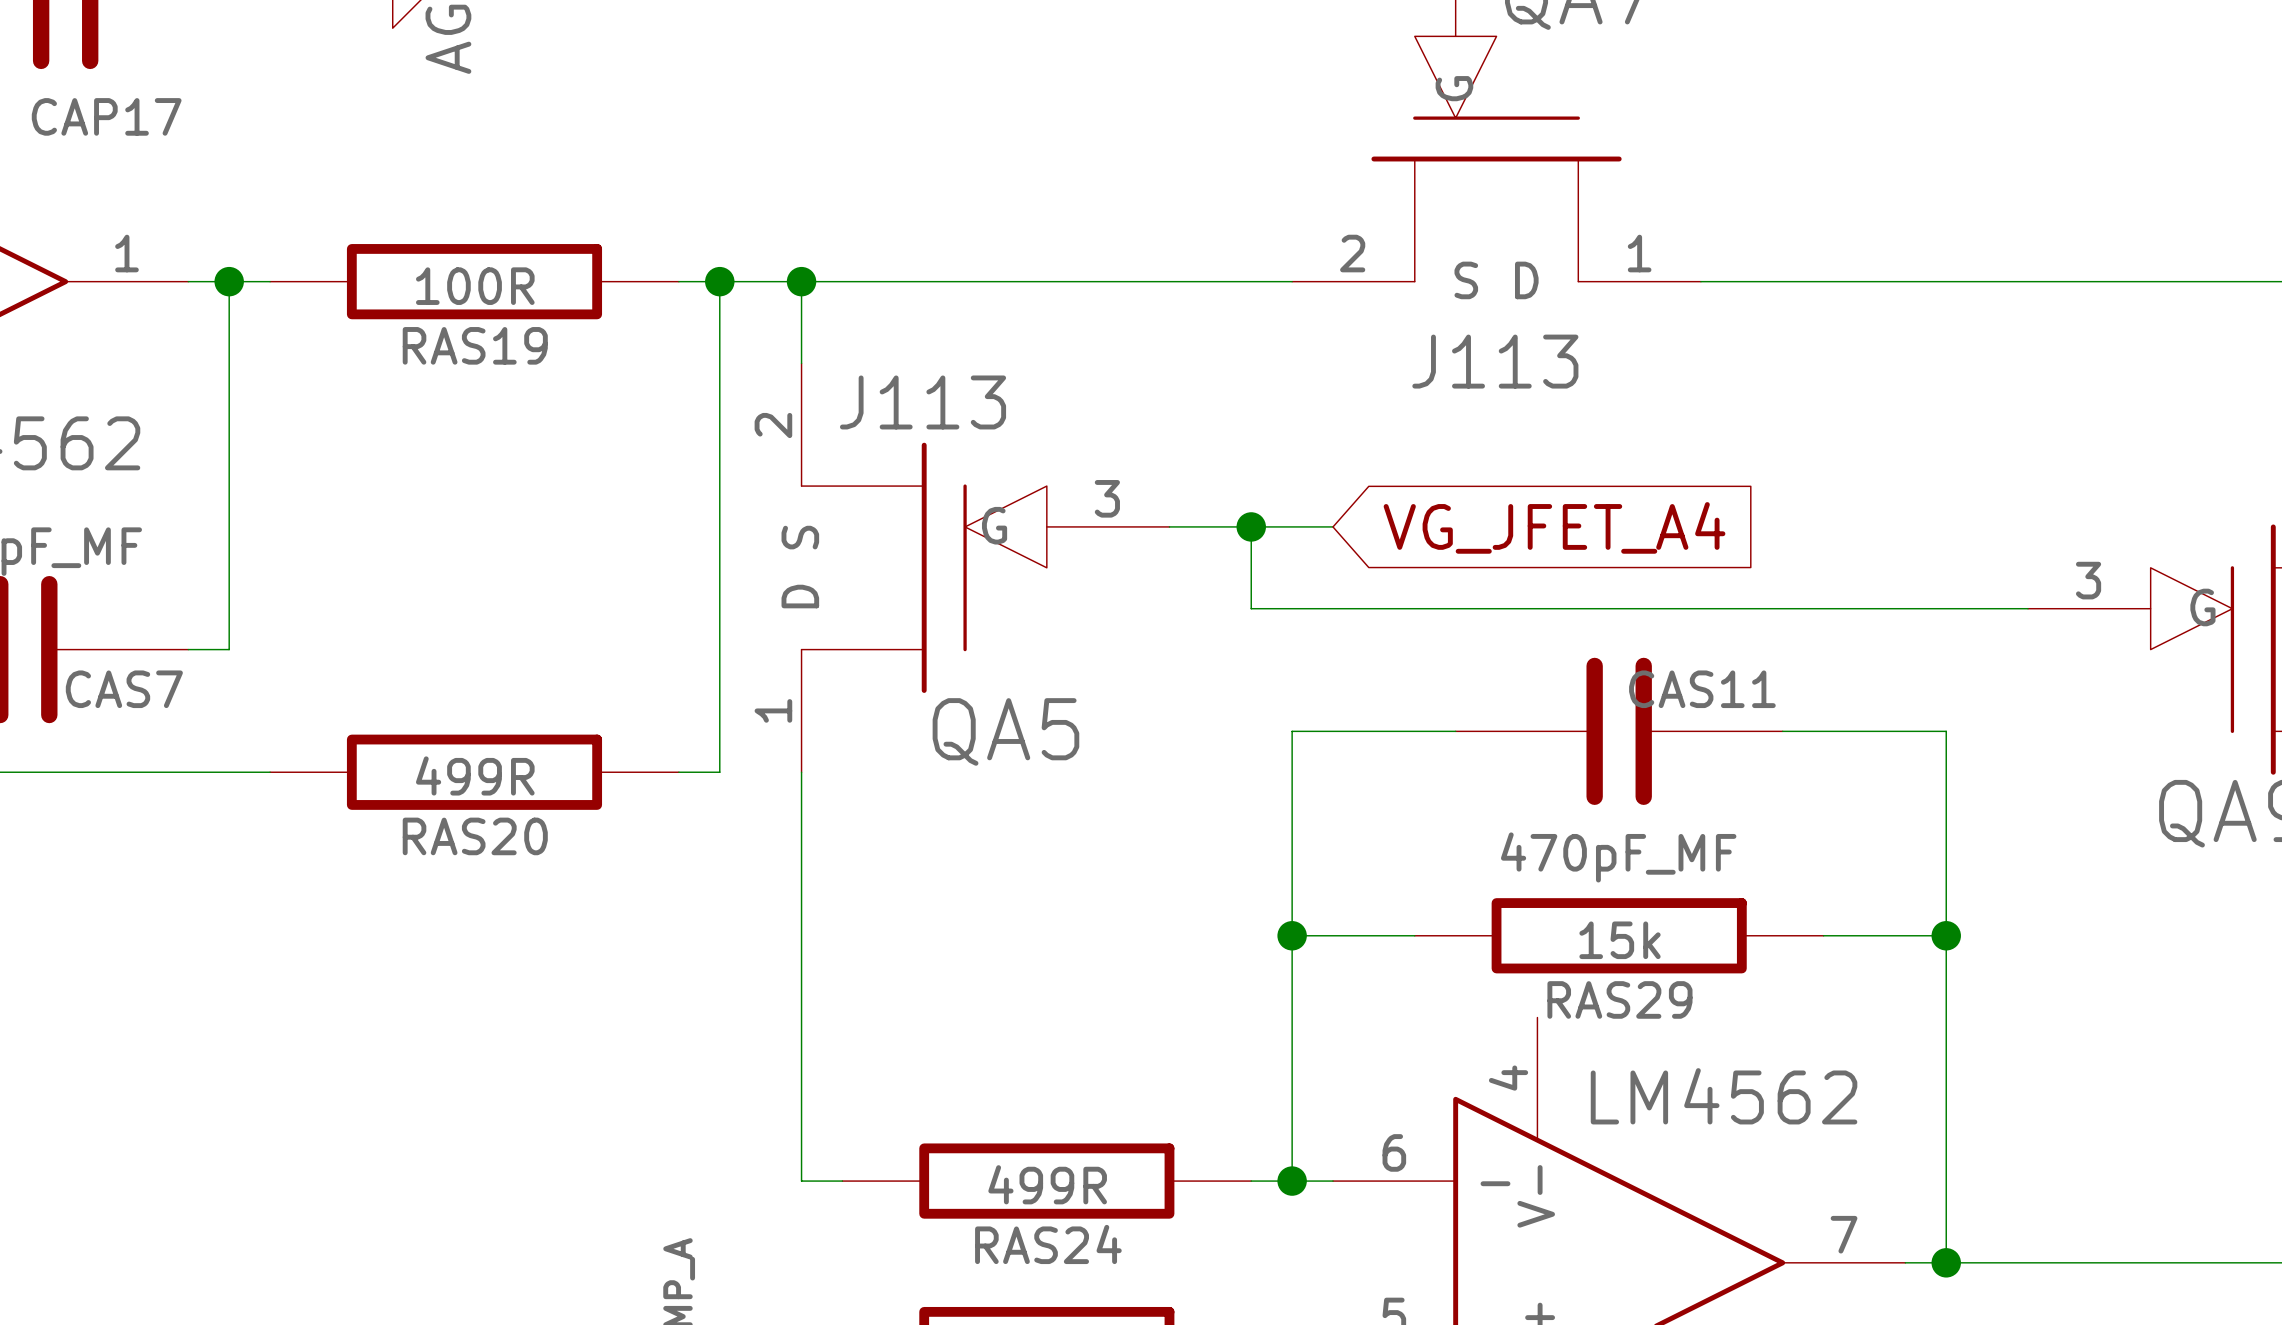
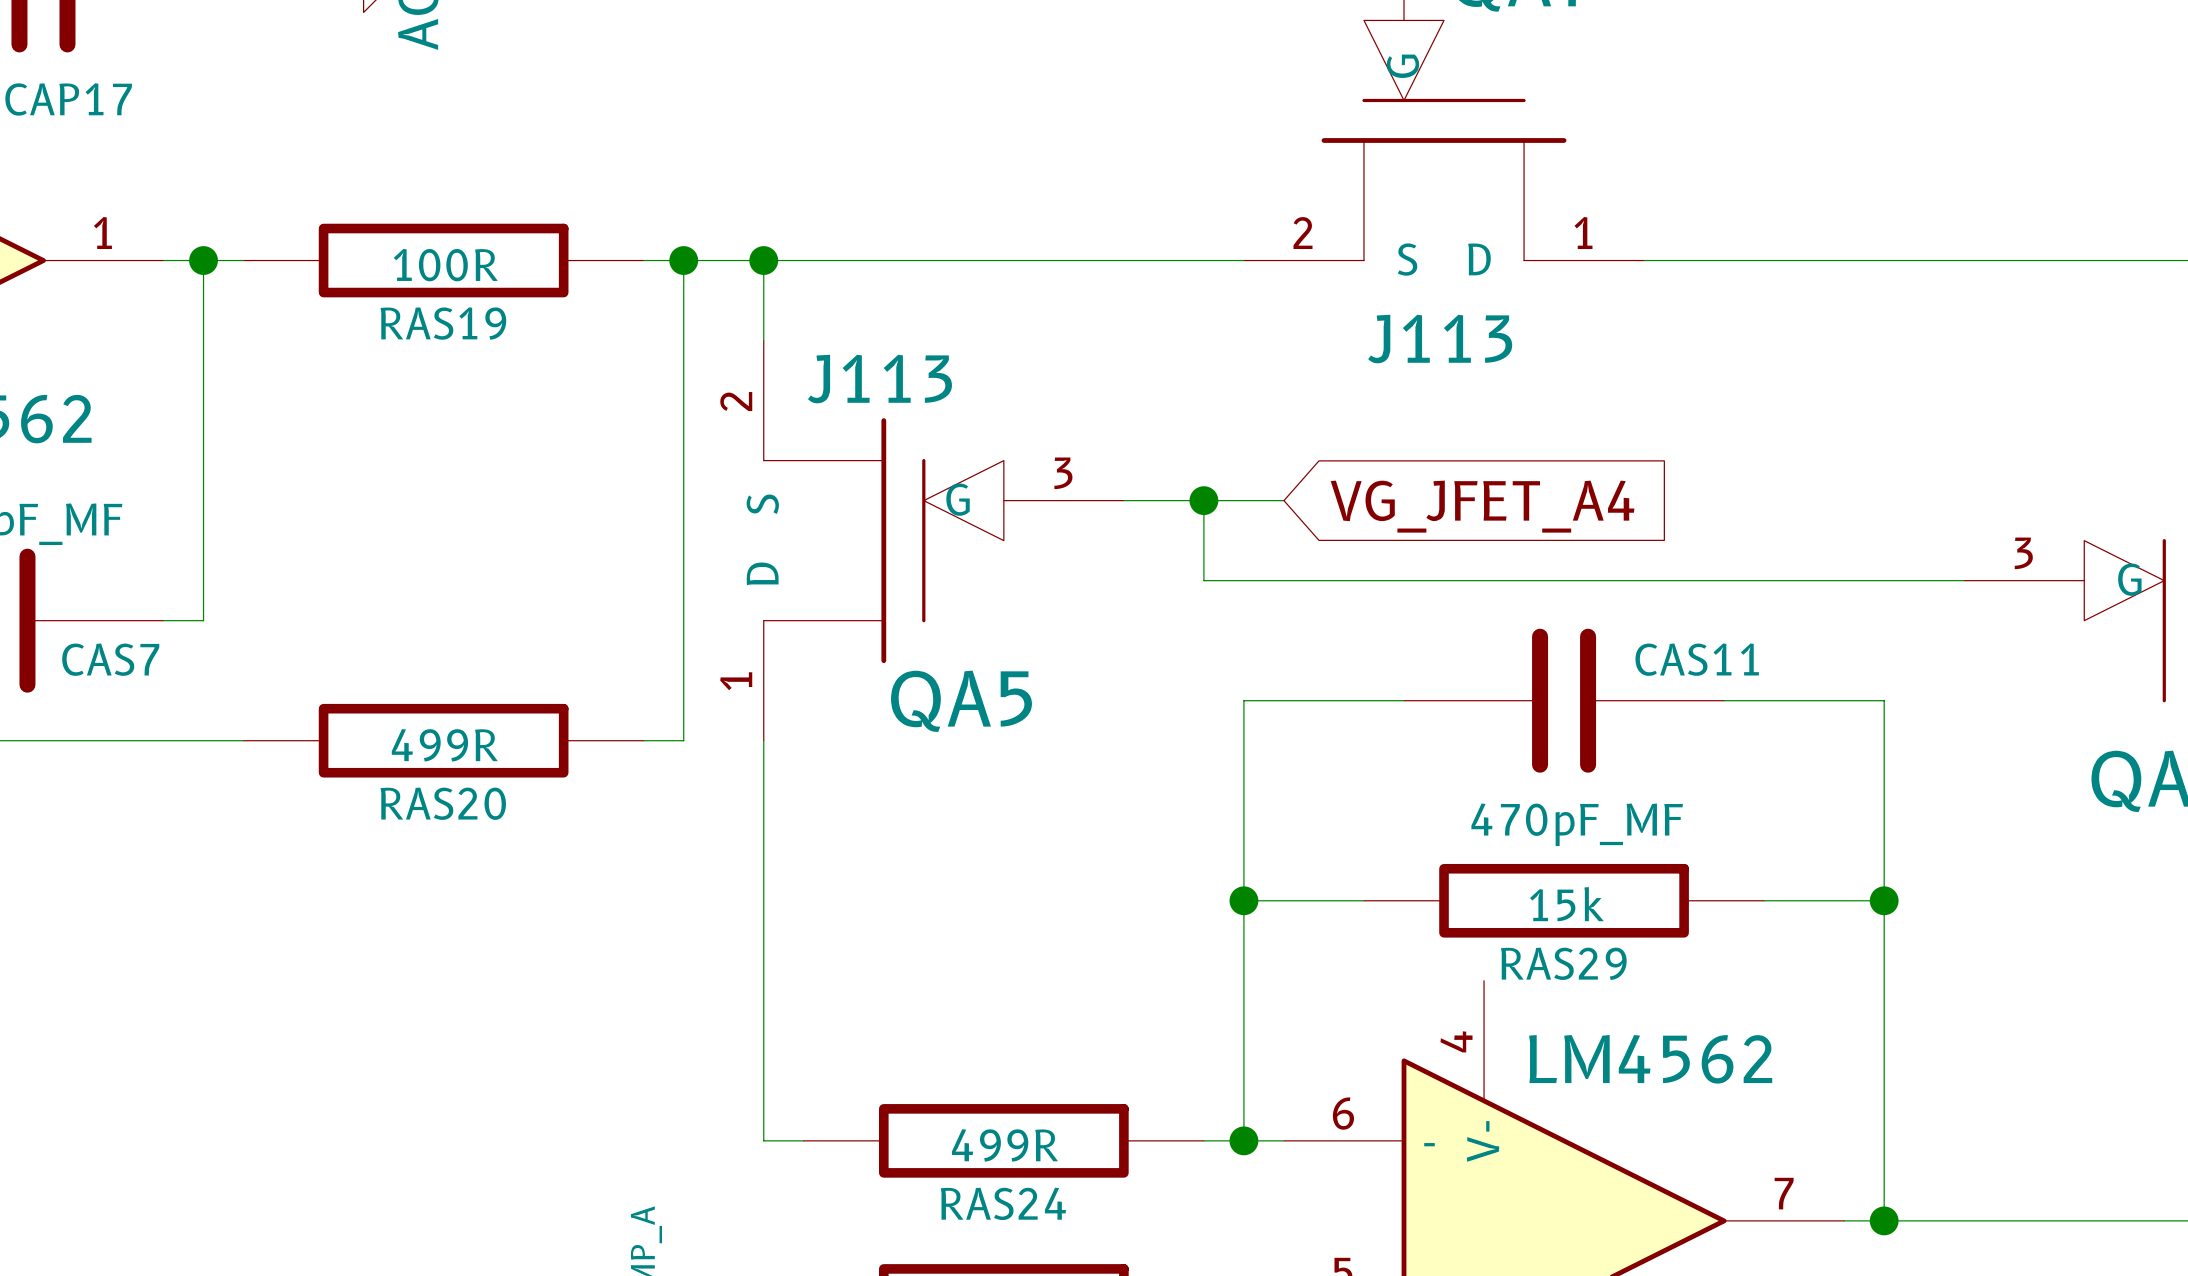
CAS11 name position: CAS11 (1702, 689) -> CAS11 (1697, 659)

